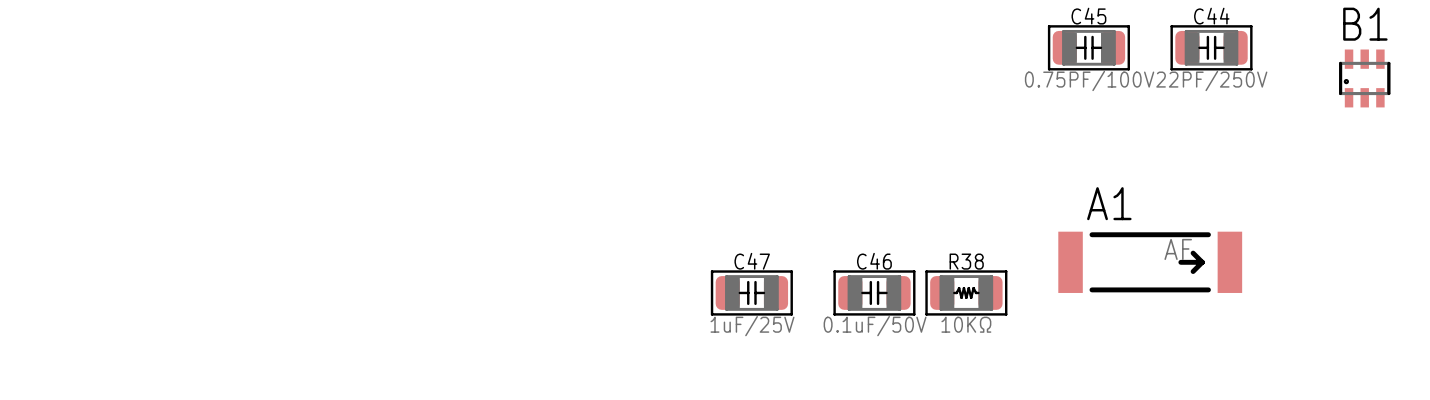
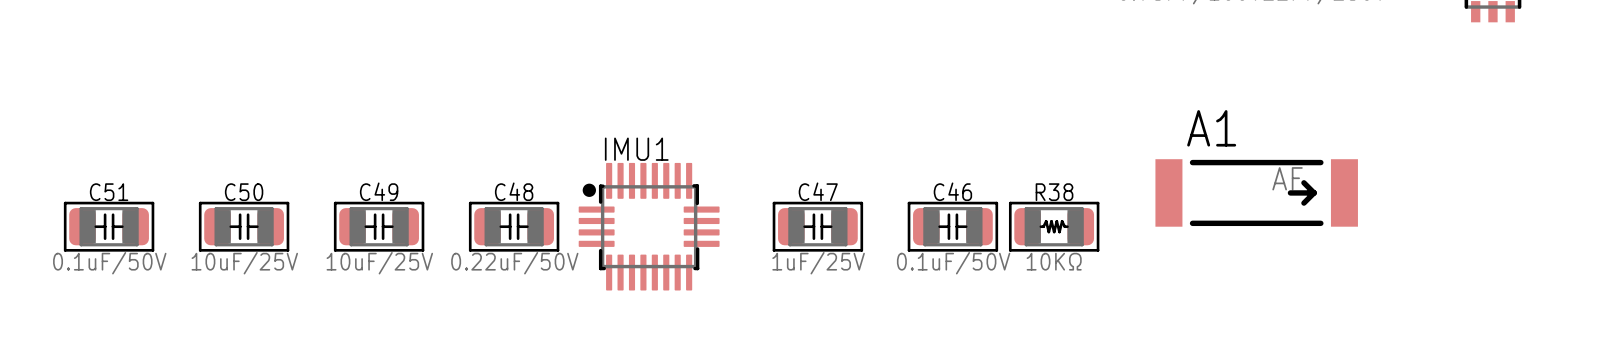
C51: none -> 0.1uF/50V (109, 226)
C50: none -> 10uF/25V (244, 226)
C49: none -> 10uF/25V (379, 226)
C48: none -> 0.22uF/50V (514, 226)
IMU1: none -> (649, 226)

